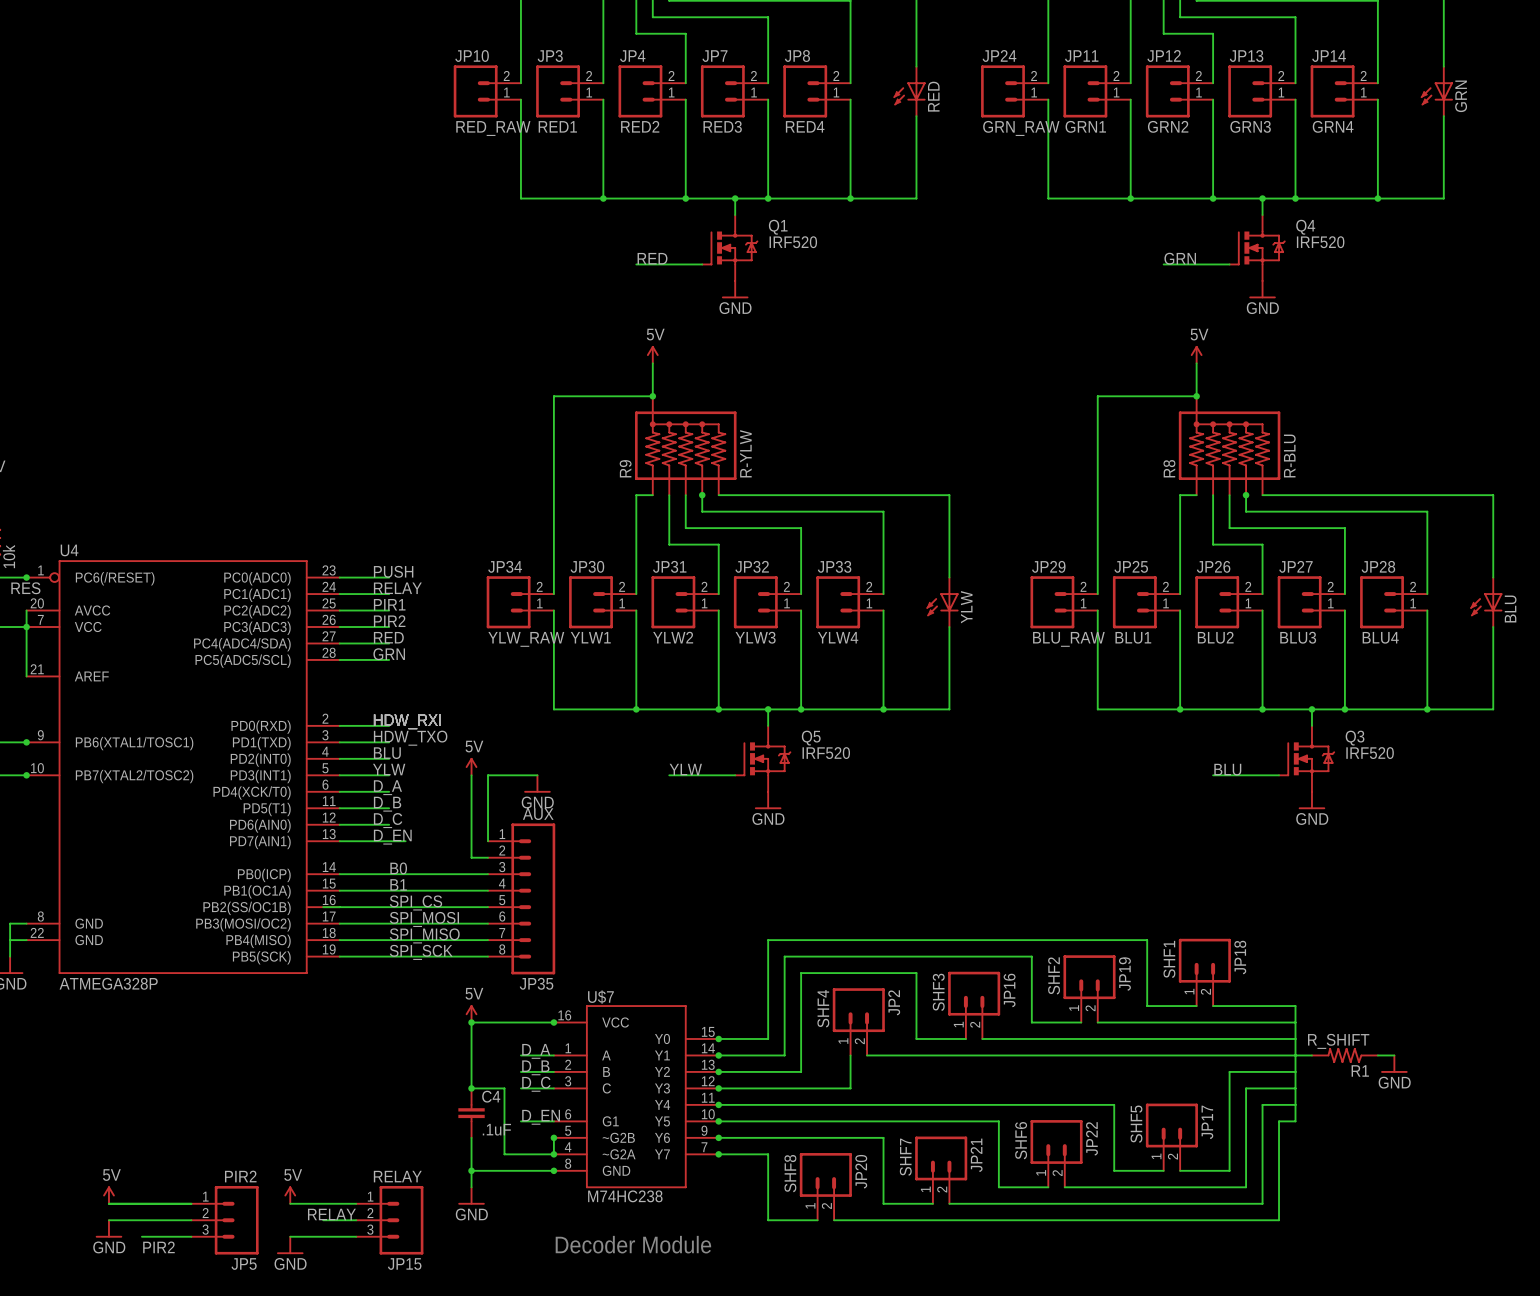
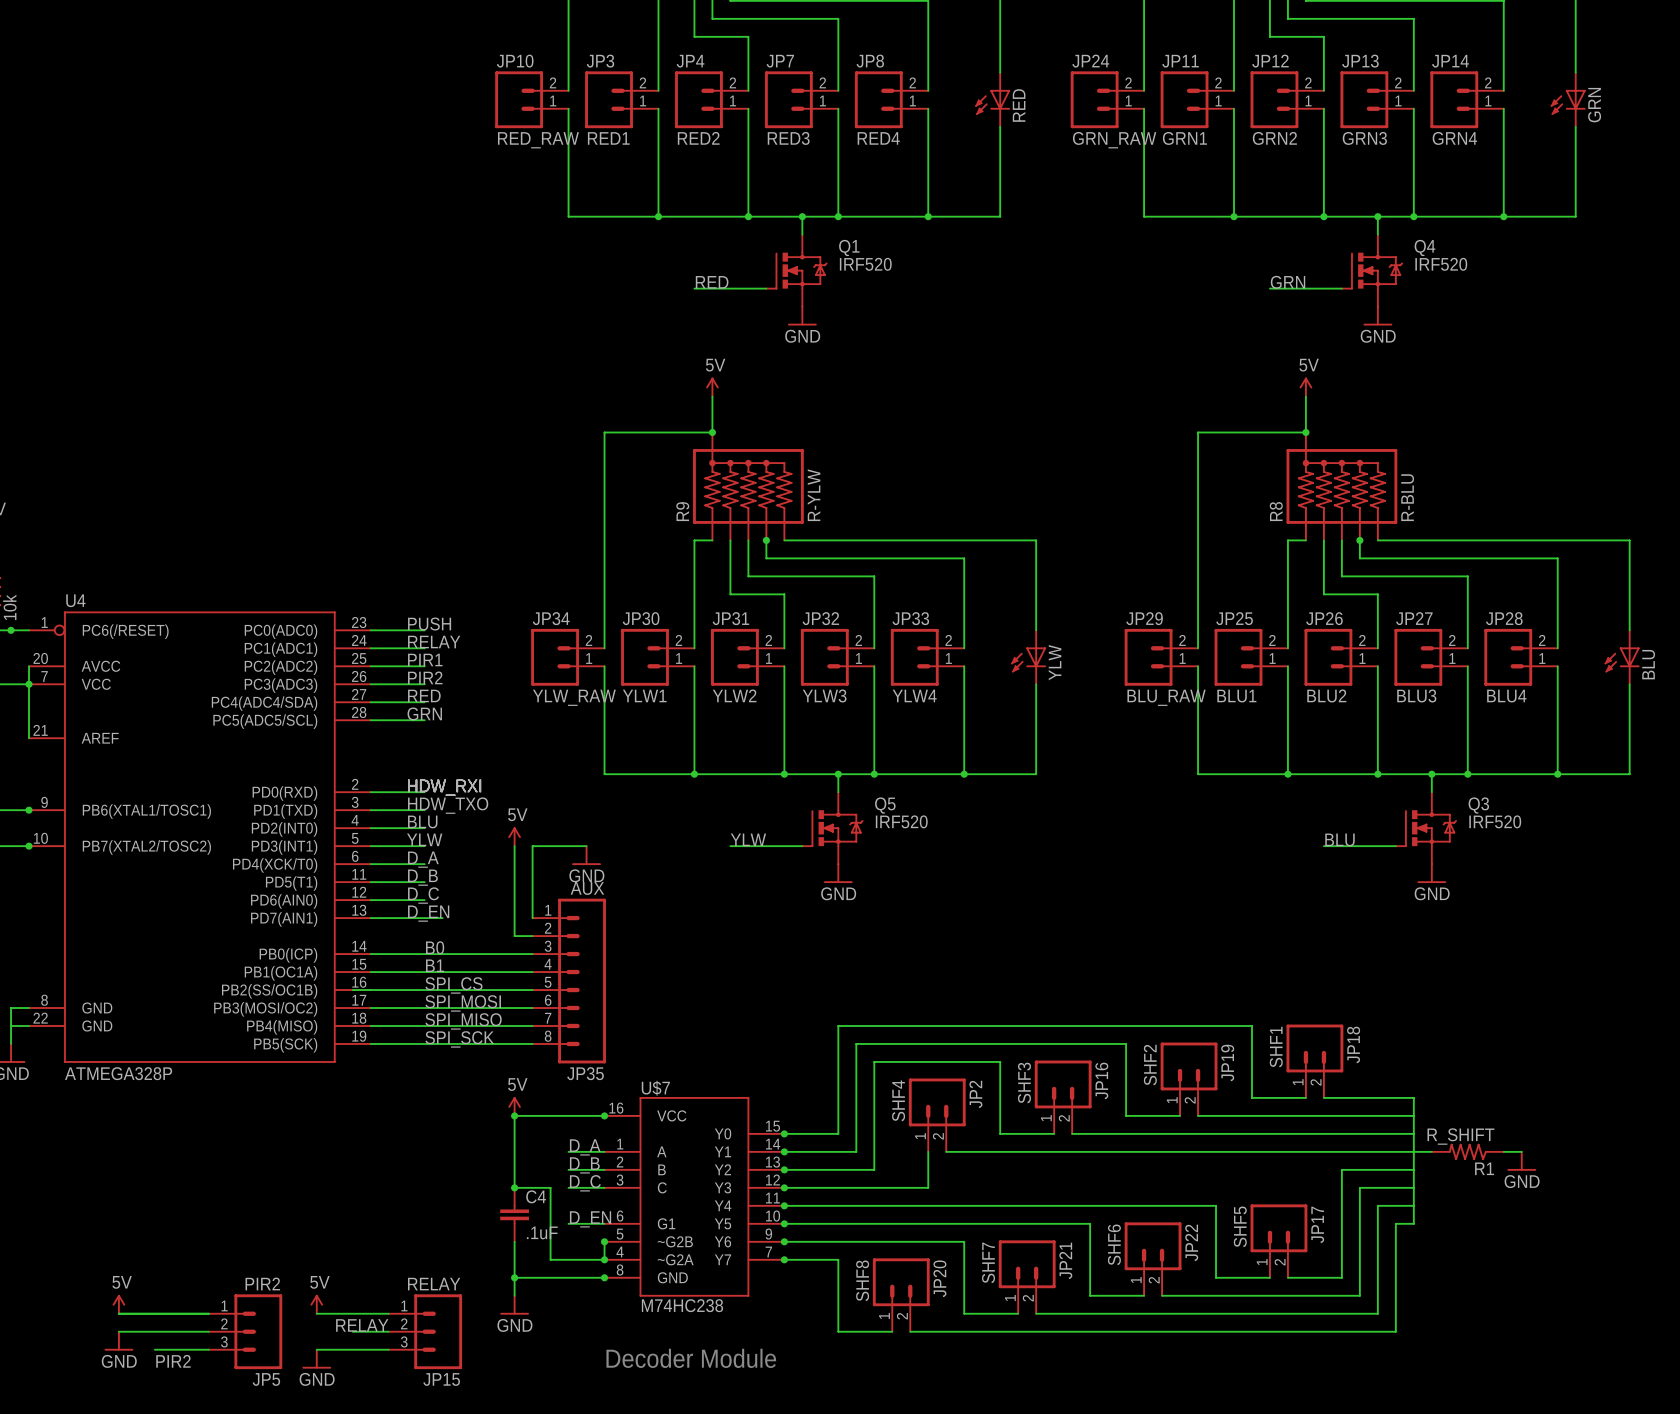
junction: none -> (11, 630)
junction: (26, 577) -> none
label: RES (25, 588) -> none

